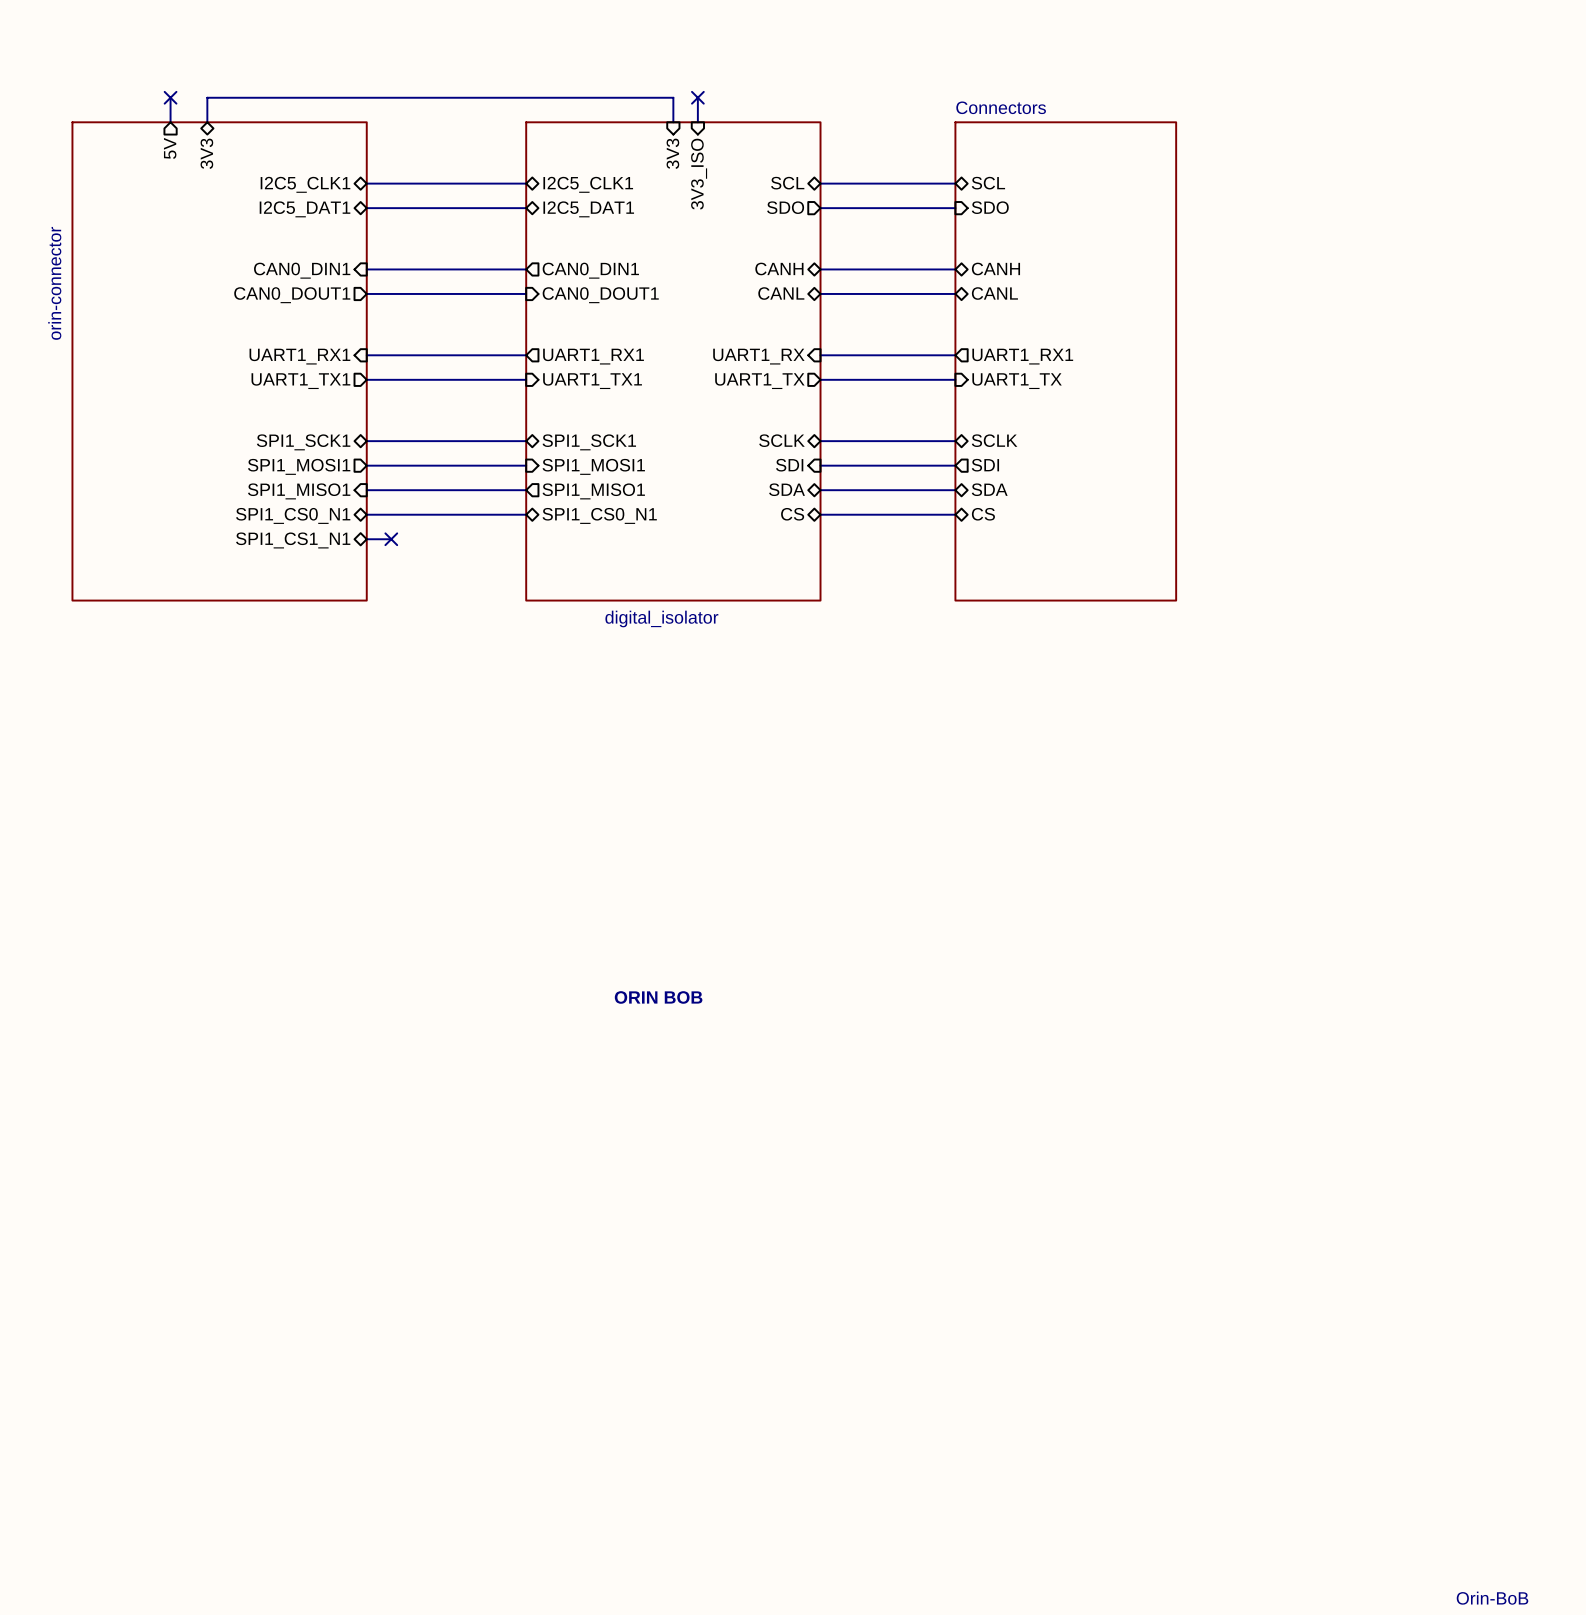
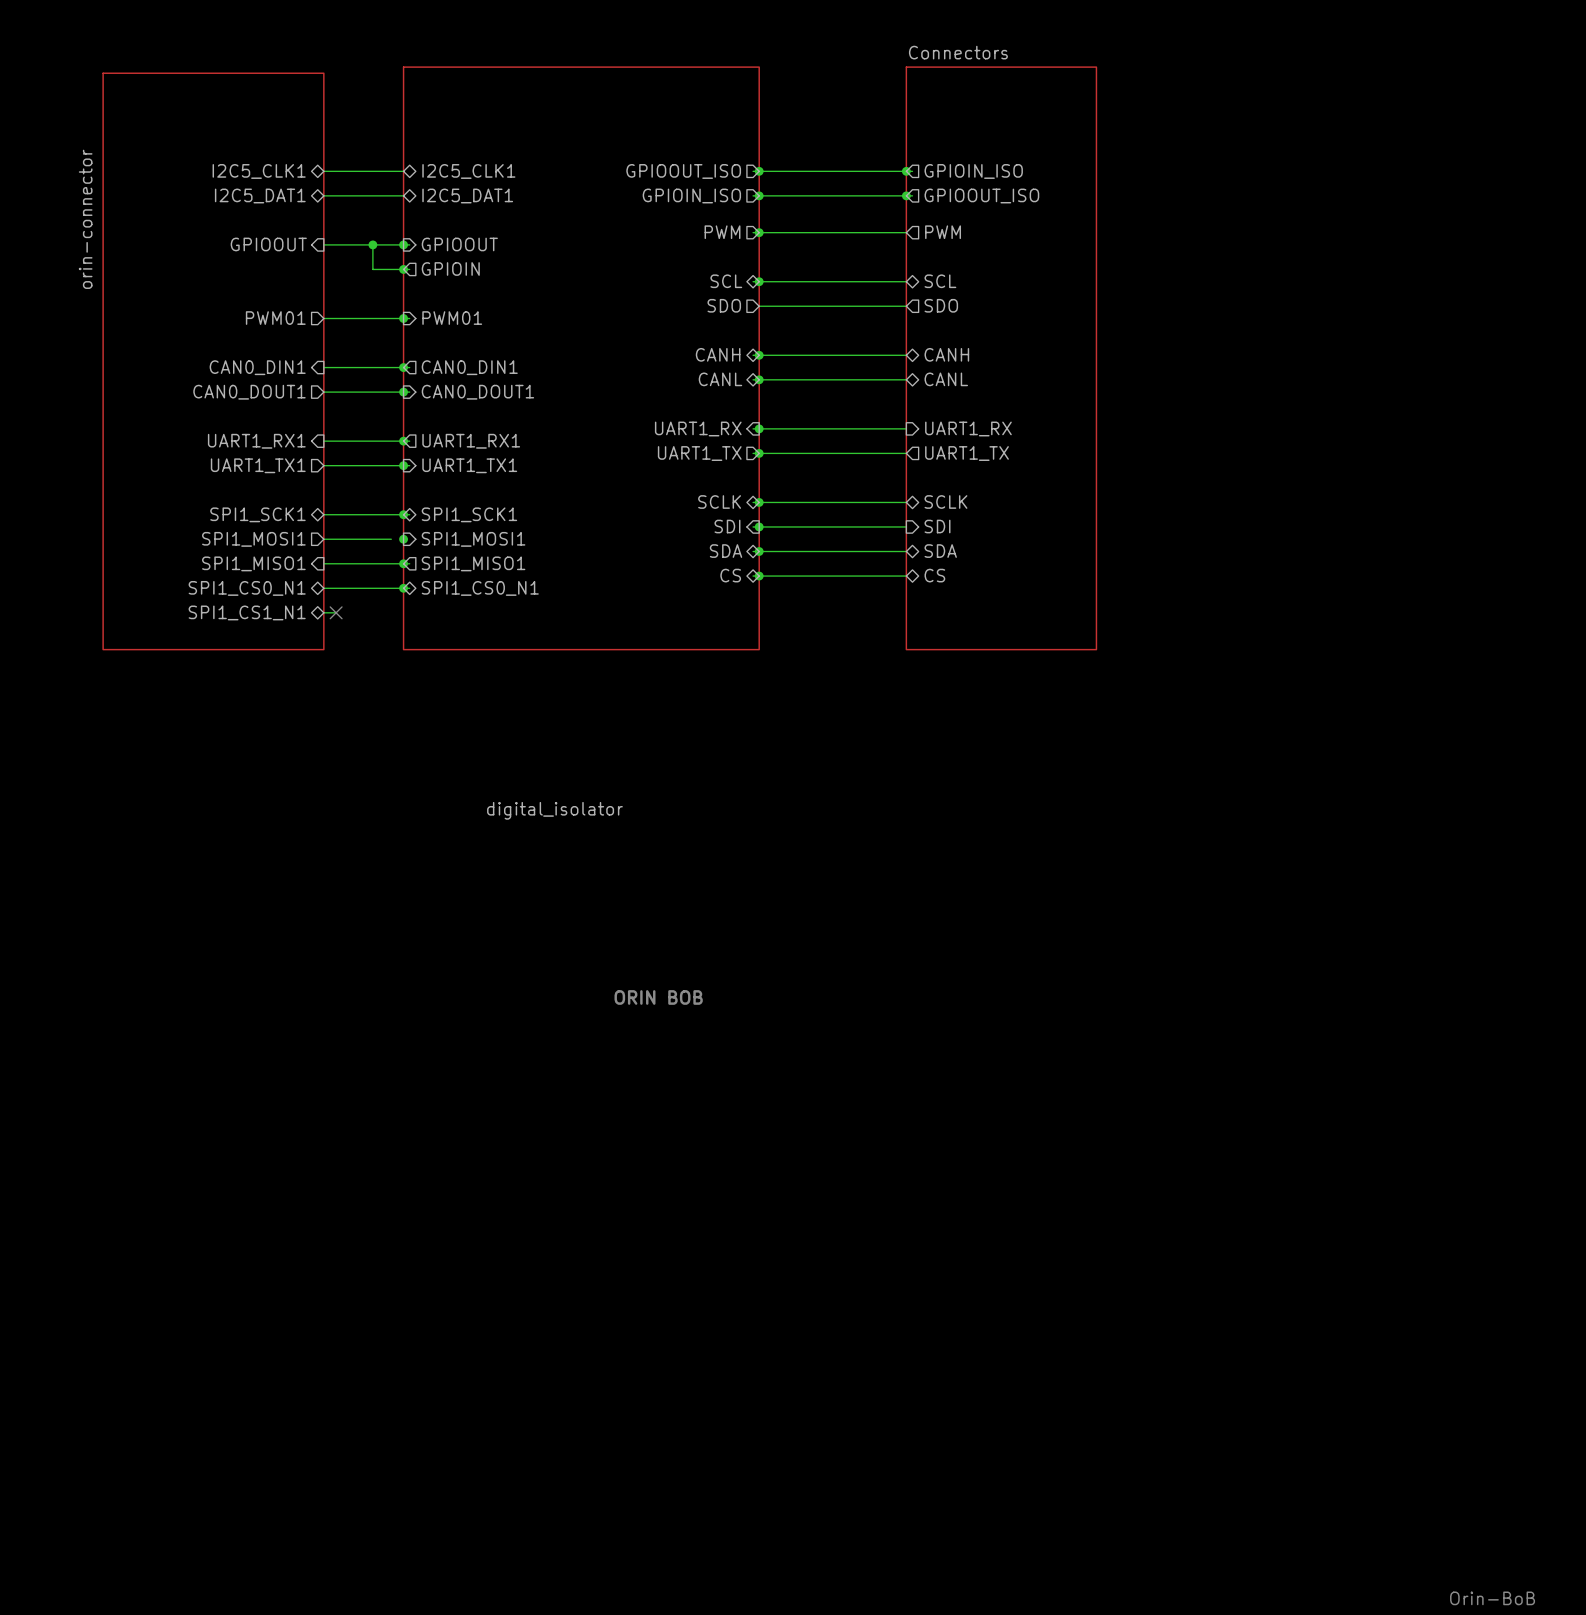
wire: (170, 97) (170, 122) -> none
no-connect mark: (170, 97) -> none
wire: (697, 97) (697, 122) -> none
no-connect mark: (697, 97) -> none
sheet orin-connector shape: [71, 121, 368, 602] -> [102, 72, 325, 651]
wire: (207, 122) (207, 97) (673, 97) (673, 122) -> none
sheet pin: 5V (170, 148) -> none
sheet pin: 3V3 (206, 153) -> none
sheet pin: 3V3 (672, 153) -> none
wire: none -> (323, 171) (403, 171)
wire: none -> (753, 171) (912, 171)
junction: none -> (759, 171)
junction: none -> (906, 171)
sheet pin: none -> I2C5_CLK1 (259, 171)
sheet pin: none -> I2C5_CLK1 (468, 171)
sheet pin: none -> GPIOOUT_ISO (683, 171)
sheet pin: none -> GPIOIN_ISO (973, 171)
sheet pin: 3V3_ISO (699, 174) -> none
wire: (366, 183) (526, 183) -> none
sheet pin: SCL (787, 183) -> none
wire: (820, 183) (955, 183) -> none
sheet pin: SCL (988, 183) -> none
sheet pin: I2C5_CLK1 (305, 184) -> none
sheet pin: I2C5_CLK1 (588, 184) -> none
wire: none -> (323, 195) (403, 195)
wire: none -> (753, 195) (912, 195)
junction: none -> (759, 195)
junction: none -> (906, 195)
sheet pin: none -> I2C5_DAT1 (260, 196)
sheet pin: none -> I2C5_DAT1 (467, 196)
sheet pin: none -> GPIOIN_ISO (691, 196)
sheet pin: none -> GPIOOUT_ISO (981, 196)
sheet pin: SDO (785, 207) -> none
sheet pin: SDO (990, 207) -> none
wire: (366, 208) (526, 208) -> none
wire: (820, 208) (955, 208) -> none
sheet pin: I2C5_DAT1 (305, 209) -> none
sheet pin: I2C5_DAT1 (588, 209) -> none
sheet pin: none -> PWM (722, 232)
wire: none -> (753, 232) (906, 232)
junction: none -> (759, 232)
sheet pin: none -> PWM (943, 232)
sheet pin: none -> GPIOOUT (268, 244)
wire: none -> (323, 244) (409, 244)
junction: none -> (372, 244)
junction: none -> (403, 244)
sheet pin: none -> GPIOOUT (459, 244)
sheet pin: none -> GPIOIN (450, 268)
sheet pin: CANH (779, 268) -> none
sheet pin: CANH (995, 268) -> none
wire: (366, 269) (372, 269) -> (372, 244) (372, 269)
junction: none -> (403, 269)
wire: (409, 269) (526, 269) -> none
wire: (820, 269) (955, 269) -> none
sheet pin: CAN0_DIN1 (302, 270) -> none
sheet pin: CAN0_DIN1 (590, 270) -> none
sheet pin: none -> SCL (726, 281)
wire: none -> (753, 281) (906, 281)
junction: none -> (759, 281)
sheet pin: none -> SCL (940, 281)
sheet orin-connector name position: orin-connector (54, 283) -> orin-connector (85, 219)
wire: (366, 293) (526, 293) -> none
sheet pin: CANL (781, 293) -> none
wire: (820, 293) (955, 293) -> none
sheet pin: CANL (994, 293) -> none
sheet pin: CAN0_DOUT1 (292, 295) -> none
sheet pin: CAN0_DOUT1 (600, 295) -> none
sheet pin: none -> SDO (724, 305)
sheet pin: none -> SDO (941, 305)
wire: none -> (759, 306) (906, 306)
sheet pin: none -> PWM01 (275, 318)
wire: none -> (323, 318) (409, 318)
junction: none -> (403, 318)
sheet pin: none -> PWM01 (452, 318)
sheet pin: none -> CANH (718, 354)
sheet pin: none -> CANH (946, 354)
wire: (366, 355) (526, 355) -> none
wire: none -> (753, 355) (820, 355)
junction: none -> (759, 355)
wire: (906, 355) (955, 355) -> none
sheet pin: UART1_RX1 (299, 356) -> none
sheet pin: UART1_RX1 (593, 356) -> none
sheet pin: UART1_RX (758, 356) -> none
sheet pin: UART1_RX1 (1022, 356) -> none
sheet digital_isolator: none -> (581, 358)
sheet Connectors: none -> (1001, 358)
sheet digital_isolator: (673, 361) -> none
sheet Connectors: (1065, 361) -> none
wire: none -> (323, 367) (409, 367)
junction: none -> (403, 367)
sheet pin: none -> CAN0_DIN1 (257, 367)
sheet pin: none -> CAN0_DIN1 (469, 367)
wire: (366, 379) (526, 379) -> none
sheet pin: none -> CANL (720, 379)
wire: none -> (753, 379) (820, 379)
junction: none -> (759, 379)
wire: (906, 379) (955, 379) -> none
sheet pin: none -> CANL (946, 379)
sheet pin: UART1_TX1 (300, 381) -> none
sheet pin: UART1_TX1 (592, 381) -> none
sheet pin: UART1_TX (759, 381) -> none
sheet pin: UART1_TX (1017, 381) -> none
wire: none -> (323, 392) (409, 392)
junction: none -> (403, 392)
sheet pin: none -> CAN0_DOUT1 (249, 392)
sheet pin: none -> CAN0_DOUT1 (477, 392)
wire: none -> (753, 428) (906, 428)
junction: none -> (759, 428)
sheet pin: none -> UART1_RX (698, 429)
sheet pin: none -> UART1_RX (968, 429)
sheet pin: SCLK (781, 440) -> none
sheet pin: SCLK (994, 440) -> none
wire: none -> (323, 441) (366, 441)
junction: none -> (403, 441)
wire: (409, 441) (526, 441) -> none
wire: (820, 441) (955, 441) -> none
sheet pin: none -> UART1_RX1 (256, 441)
sheet pin: SPI1_SCK1 (303, 442) -> none
sheet pin: none -> UART1_RX1 (471, 441)
sheet pin: SPI1_SCK1 (589, 442) -> none
wire: none -> (753, 453) (906, 453)
junction: none -> (759, 453)
sheet pin: none -> UART1_TX (699, 453)
sheet pin: none -> UART1_TX (966, 453)
wire: none -> (323, 465) (366, 465)
junction: none -> (403, 465)
wire: (409, 465) (526, 465) -> none
sheet pin: SDI (789, 465) -> none
wire: (820, 465) (955, 465) -> none
sheet pin: SDI (985, 465) -> none
sheet pin: none -> UART1_TX1 (258, 465)
sheet pin: SPI1_MOSI1 (299, 466) -> none
sheet pin: none -> UART1_TX1 (469, 465)
sheet pin: SPI1_MOSI1 (593, 466) -> none
sheet pin: SDA (787, 489) -> none
sheet pin: SDA (989, 489) -> none
wire: (366, 490) (526, 490) -> none
wire: (820, 490) (955, 490) -> none
sheet pin: SPI1_MISO1 (299, 491) -> none
sheet pin: SPI1_MISO1 (593, 491) -> none
sheet pin: none -> SCLK (719, 502)
sheet pin: none -> SCLK (945, 502)
wire: none -> (753, 502) (906, 502)
junction: none -> (759, 502)
wire: none -> (323, 514) (366, 514)
junction: none -> (403, 514)
wire: (409, 514) (526, 514) -> none
sheet pin: CS (792, 514) -> none
wire: (820, 514) (955, 514) -> none
sheet pin: CS (983, 514) -> none
sheet pin: none -> SPI1_SCK1 (257, 514)
sheet pin: SPI1_CS0_N1 (293, 515) -> none
sheet pin: none -> SPI1_SCK1 (469, 514)
sheet pin shape: bidirectional (599, 515) -> input (473, 539)
sheet pin: SPI1_CS0_N1 (599, 515) -> SPI1_MOSI1 (473, 539)
sheet pin: none -> SDI (727, 526)
wire: none -> (753, 526) (906, 526)
junction: none -> (759, 526)
sheet pin: none -> SDI (937, 526)
wire: none -> (323, 539) (366, 539)
no-connect mark: (391, 539) -> none
junction: none -> (403, 539)
sheet pin: none -> SPI1_MOSI1 (253, 539)
sheet pin position: SPI1_CS1_N1 (293, 540) -> SPI1_CS1_N1 (247, 612)
sheet pin: none -> SDA (726, 551)
wire: none -> (753, 551) (906, 551)
junction: none -> (759, 551)
sheet pin: none -> SDA (940, 551)
wire: none -> (323, 563) (409, 563)
junction: none -> (403, 563)
sheet pin: none -> SPI1_MISO1 (253, 563)
sheet pin: none -> SPI1_MISO1 (473, 563)
sheet pin: none -> CS (730, 575)
sheet pin: none -> CS (934, 575)
wire: none -> (753, 576) (906, 576)
junction: none -> (759, 576)
wire: none -> (323, 588) (409, 588)
junction: none -> (403, 588)
sheet pin: none -> SPI1_CS0_N1 (247, 588)
sheet pin: none -> SPI1_CS0_N1 (480, 588)
wire: none -> (323, 612) (336, 612)
no-connect mark: none -> (336, 612)

